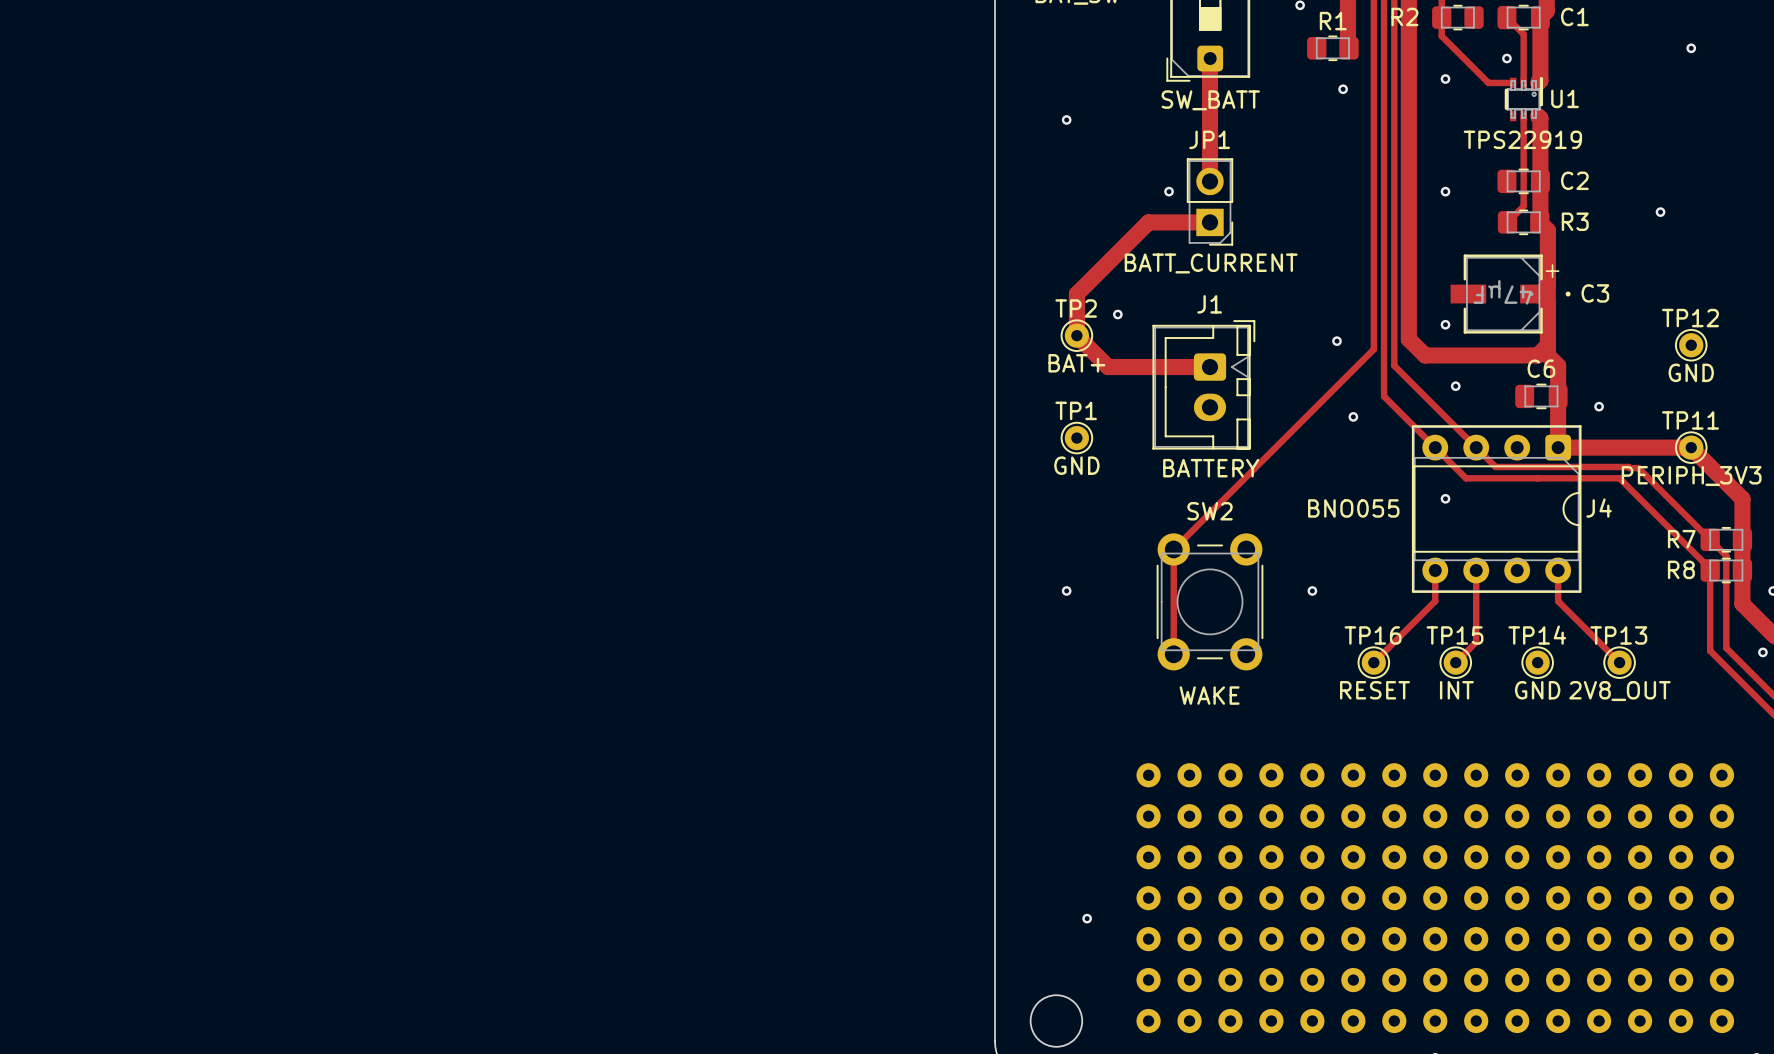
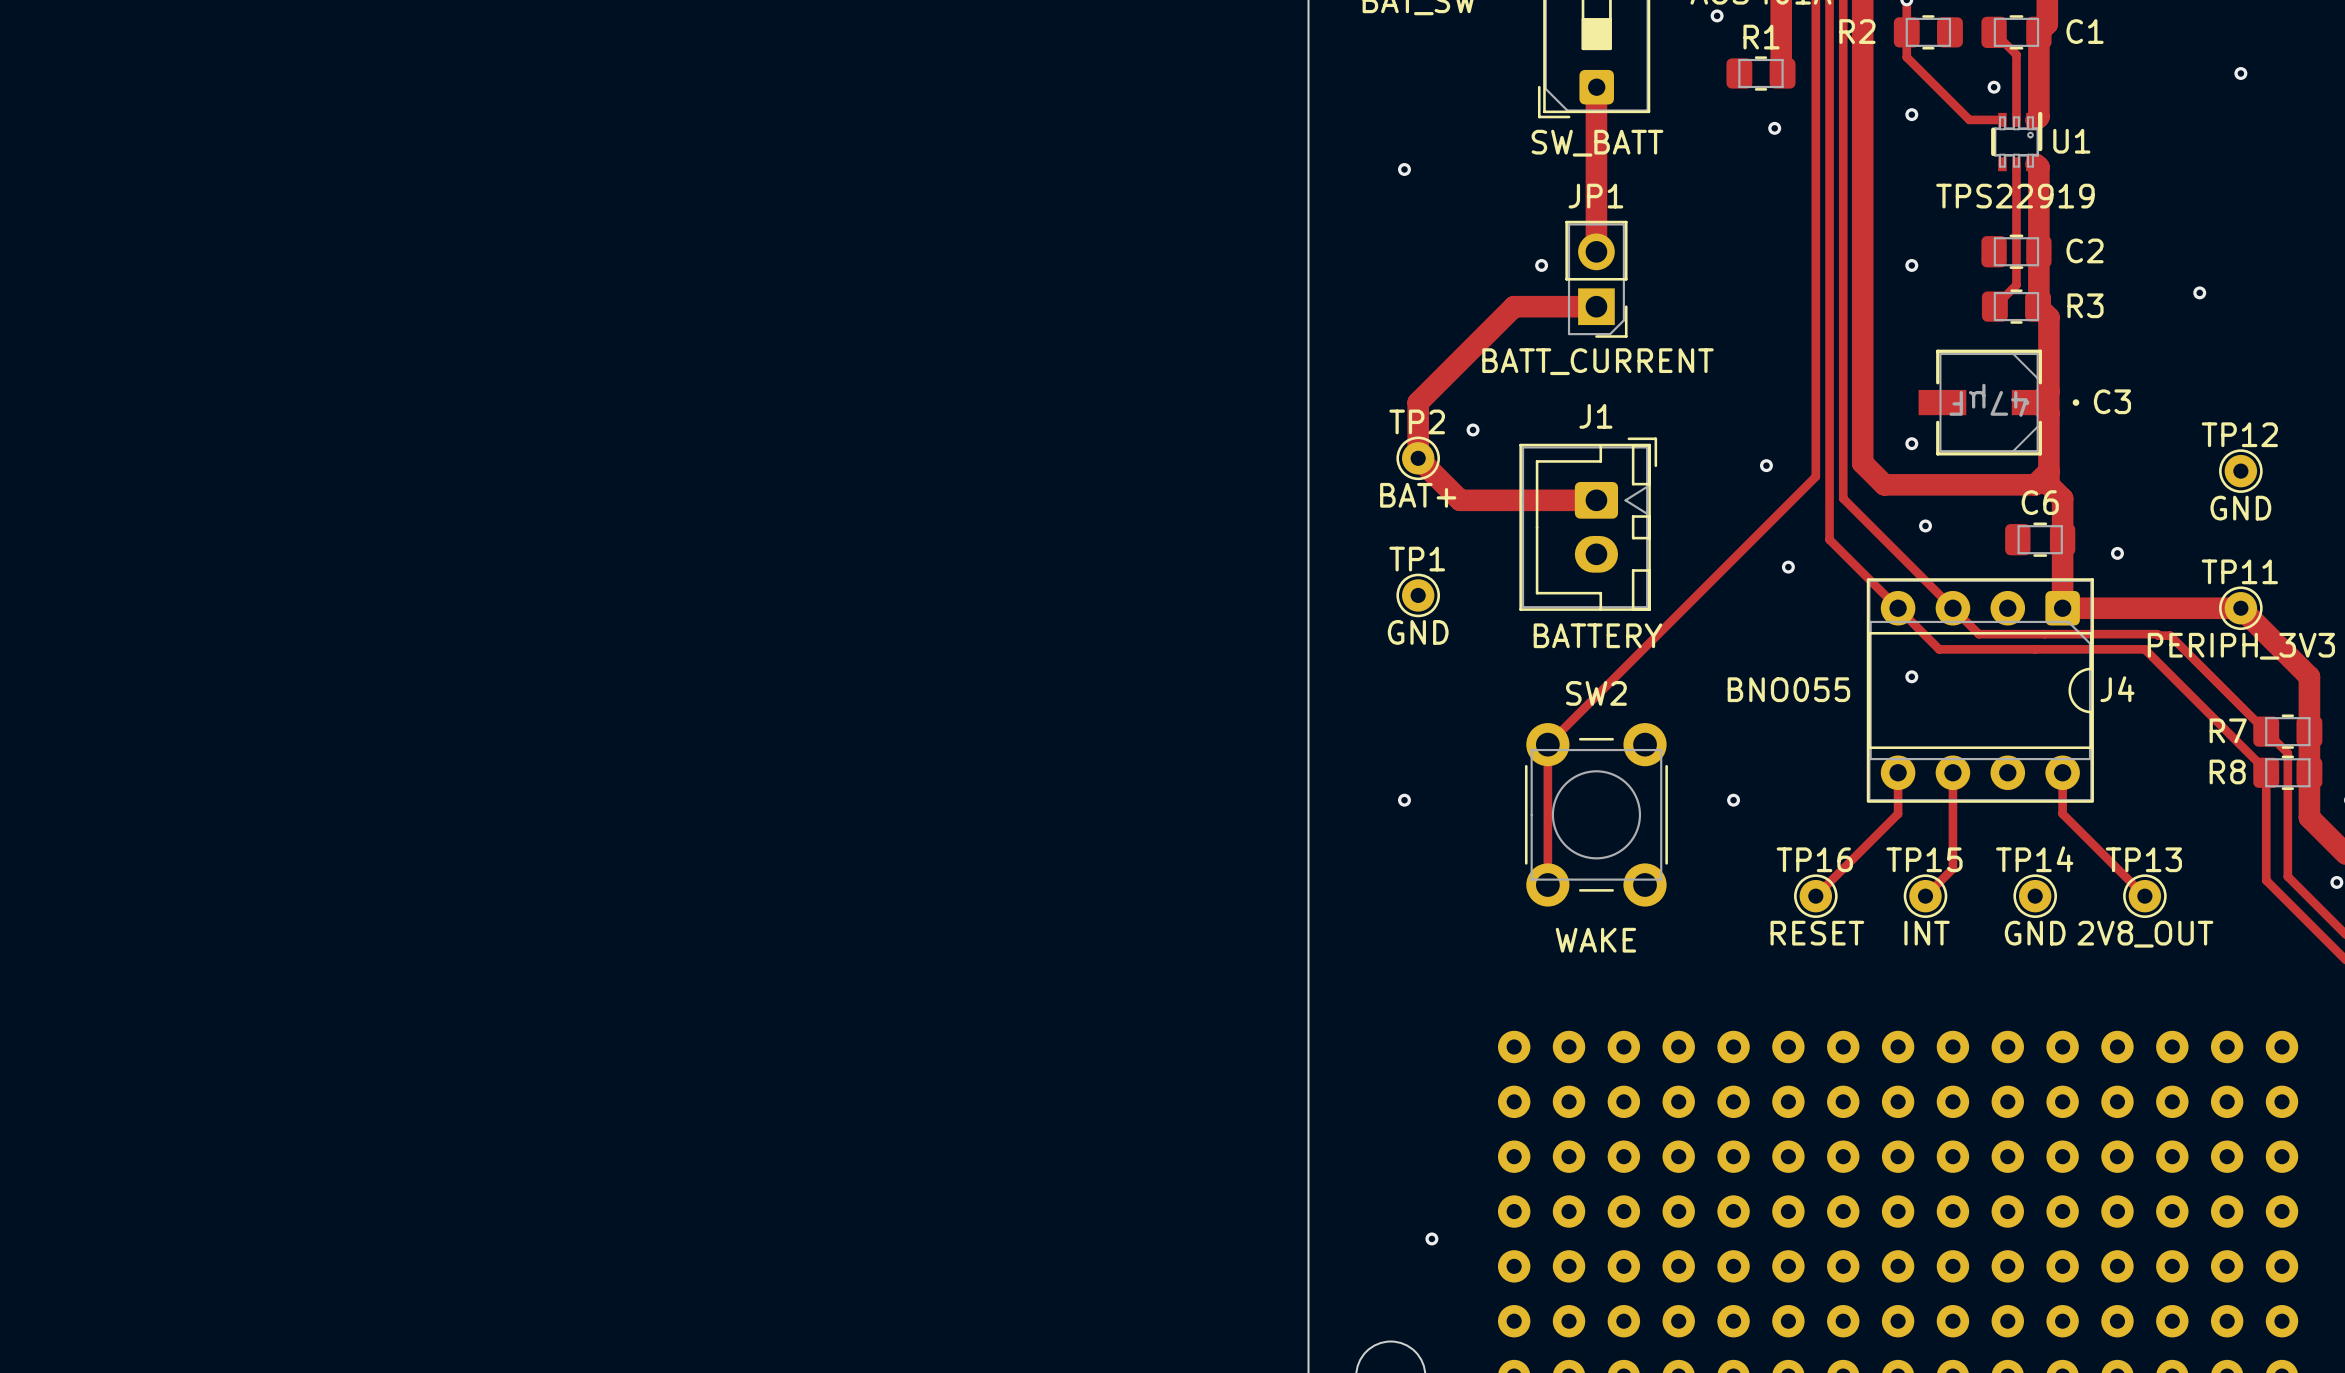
text: + (1552, 271) -> none

